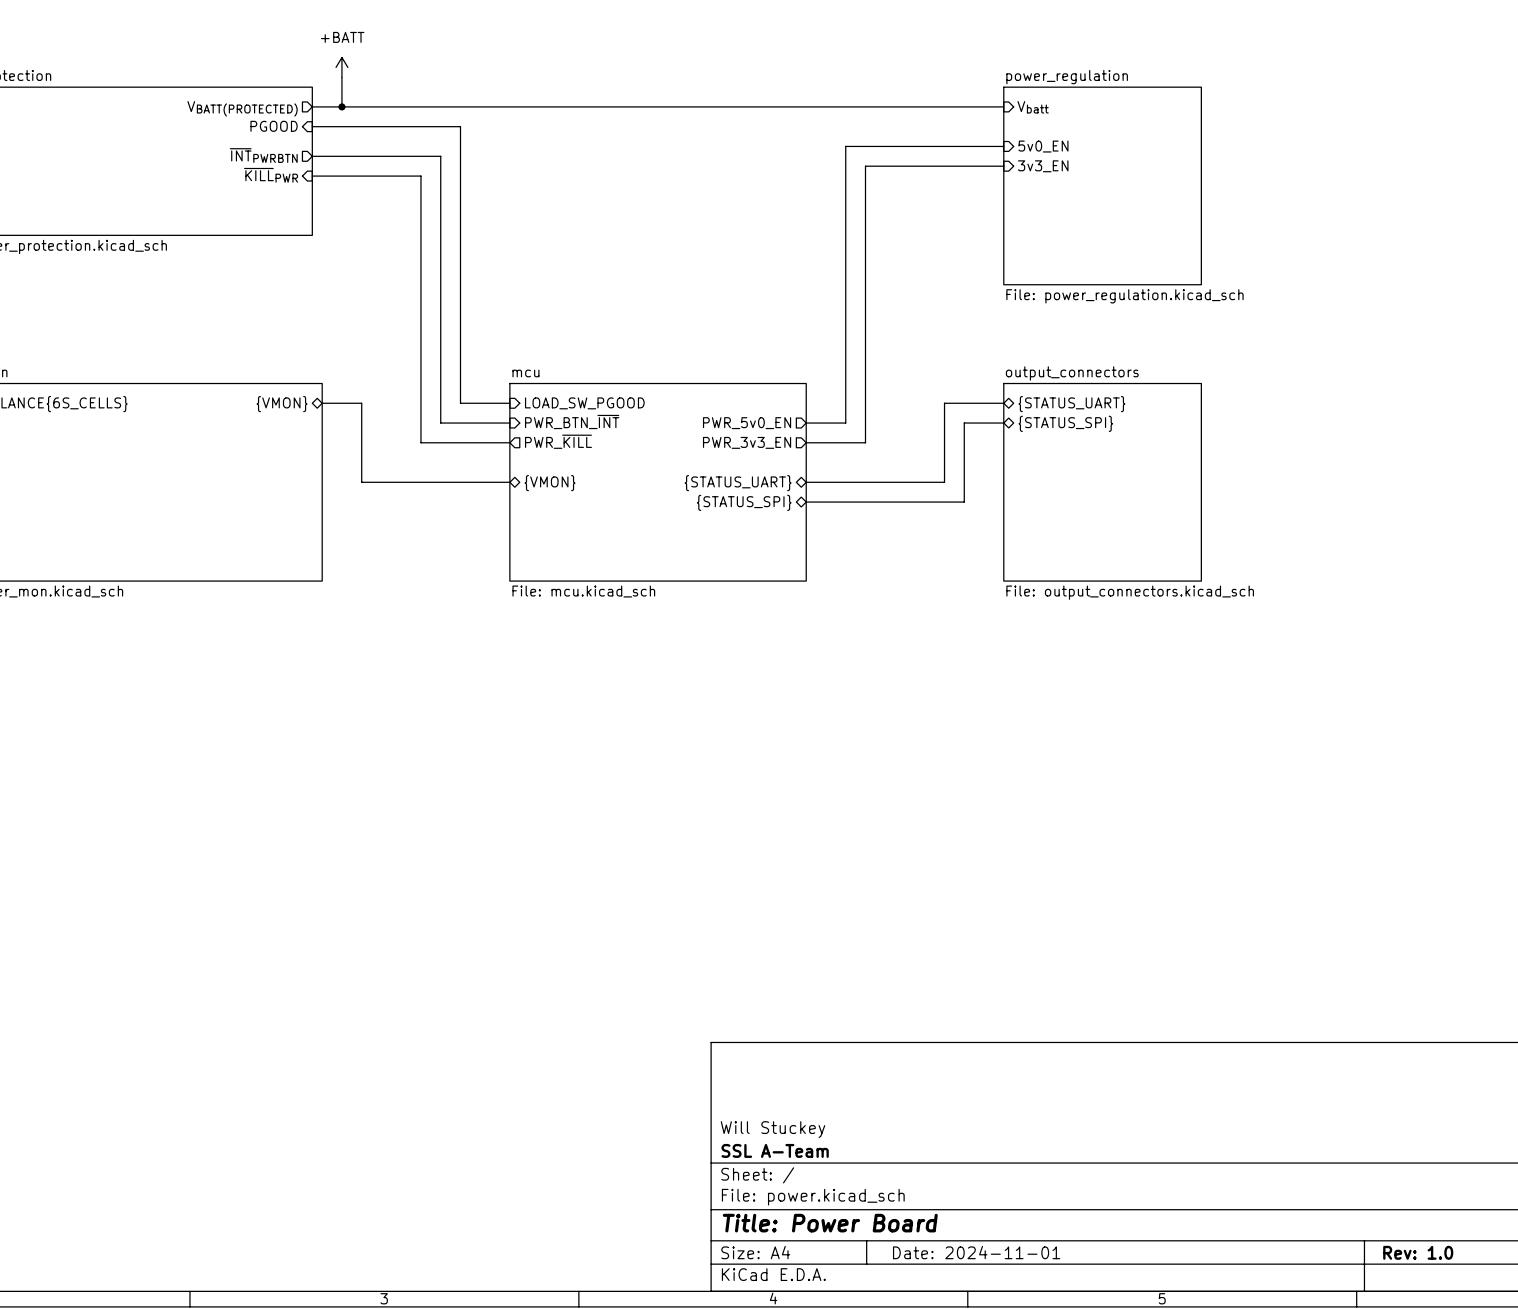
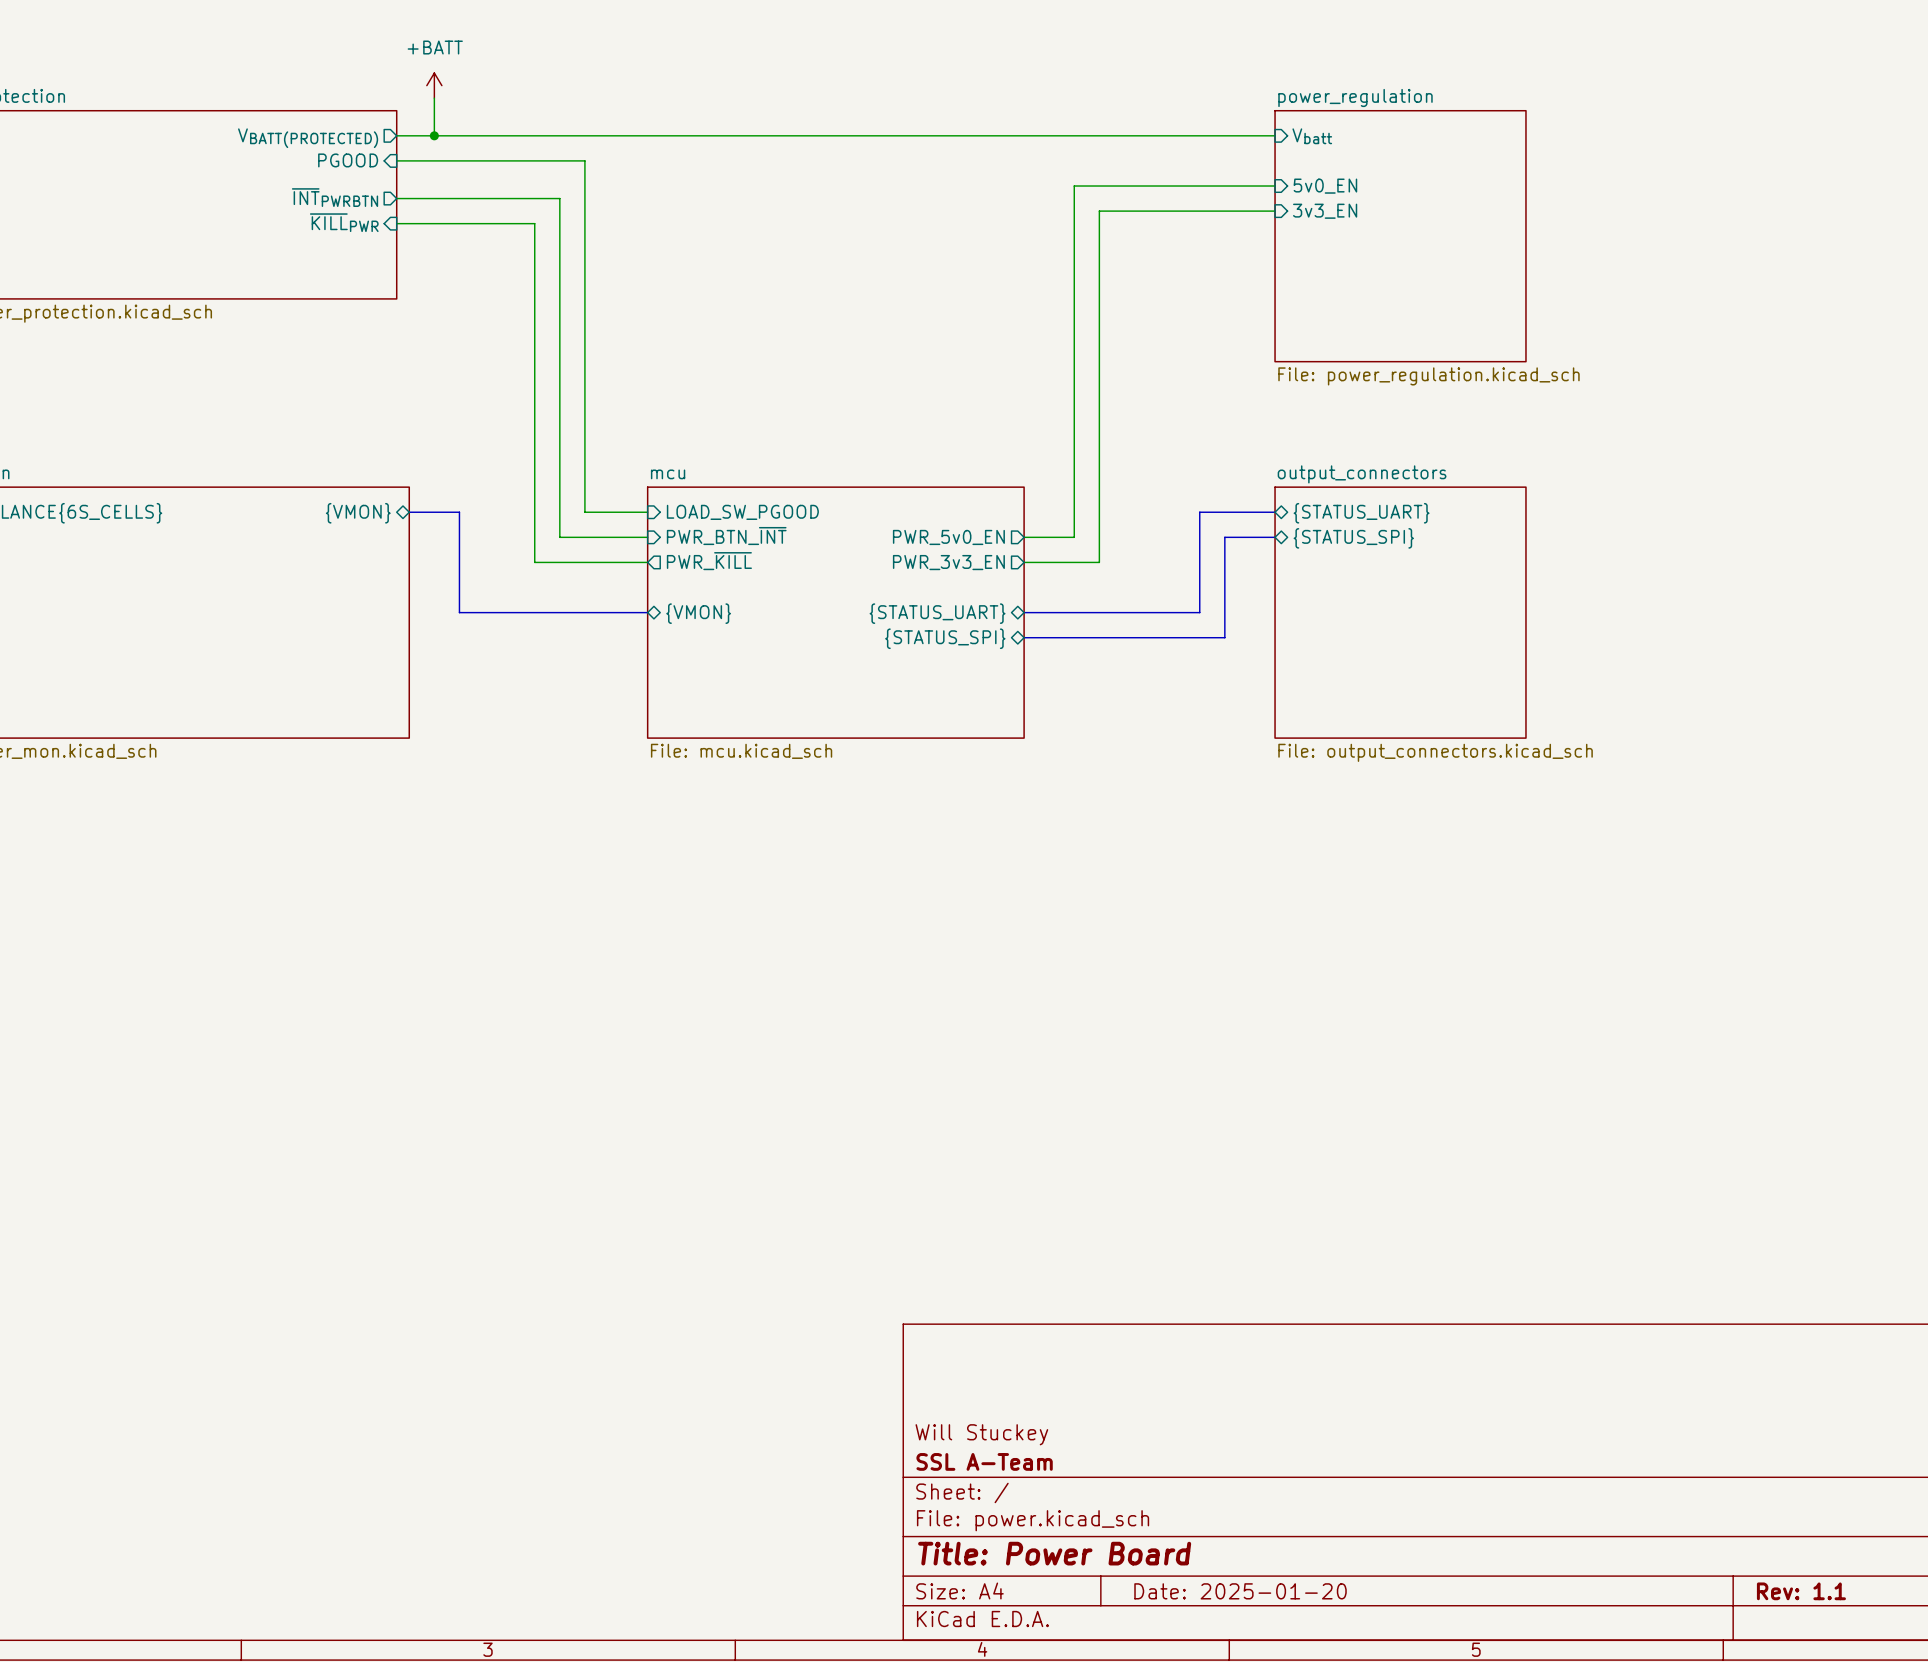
title block: Date: 2024-11-01 (976, 1252) -> Date: 2025-01-20 (1240, 1591)
title block: Rev: 1.0 (1418, 1252) -> Rev: 1.1 (1801, 1591)

